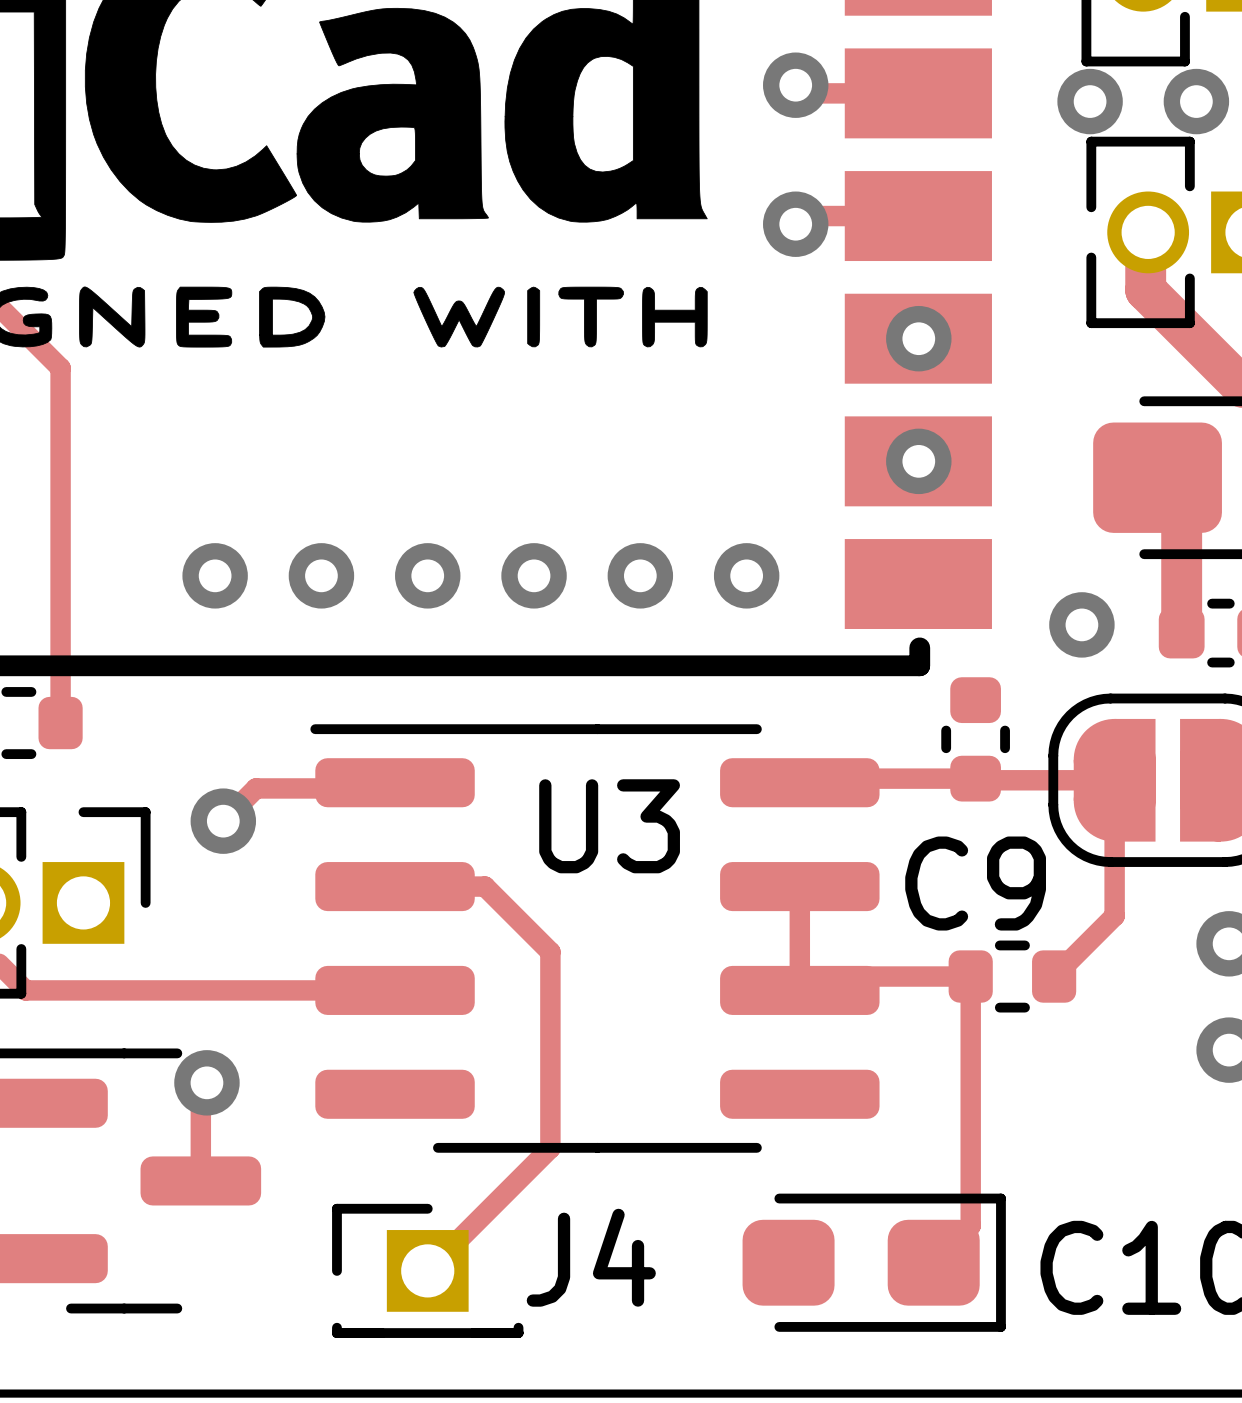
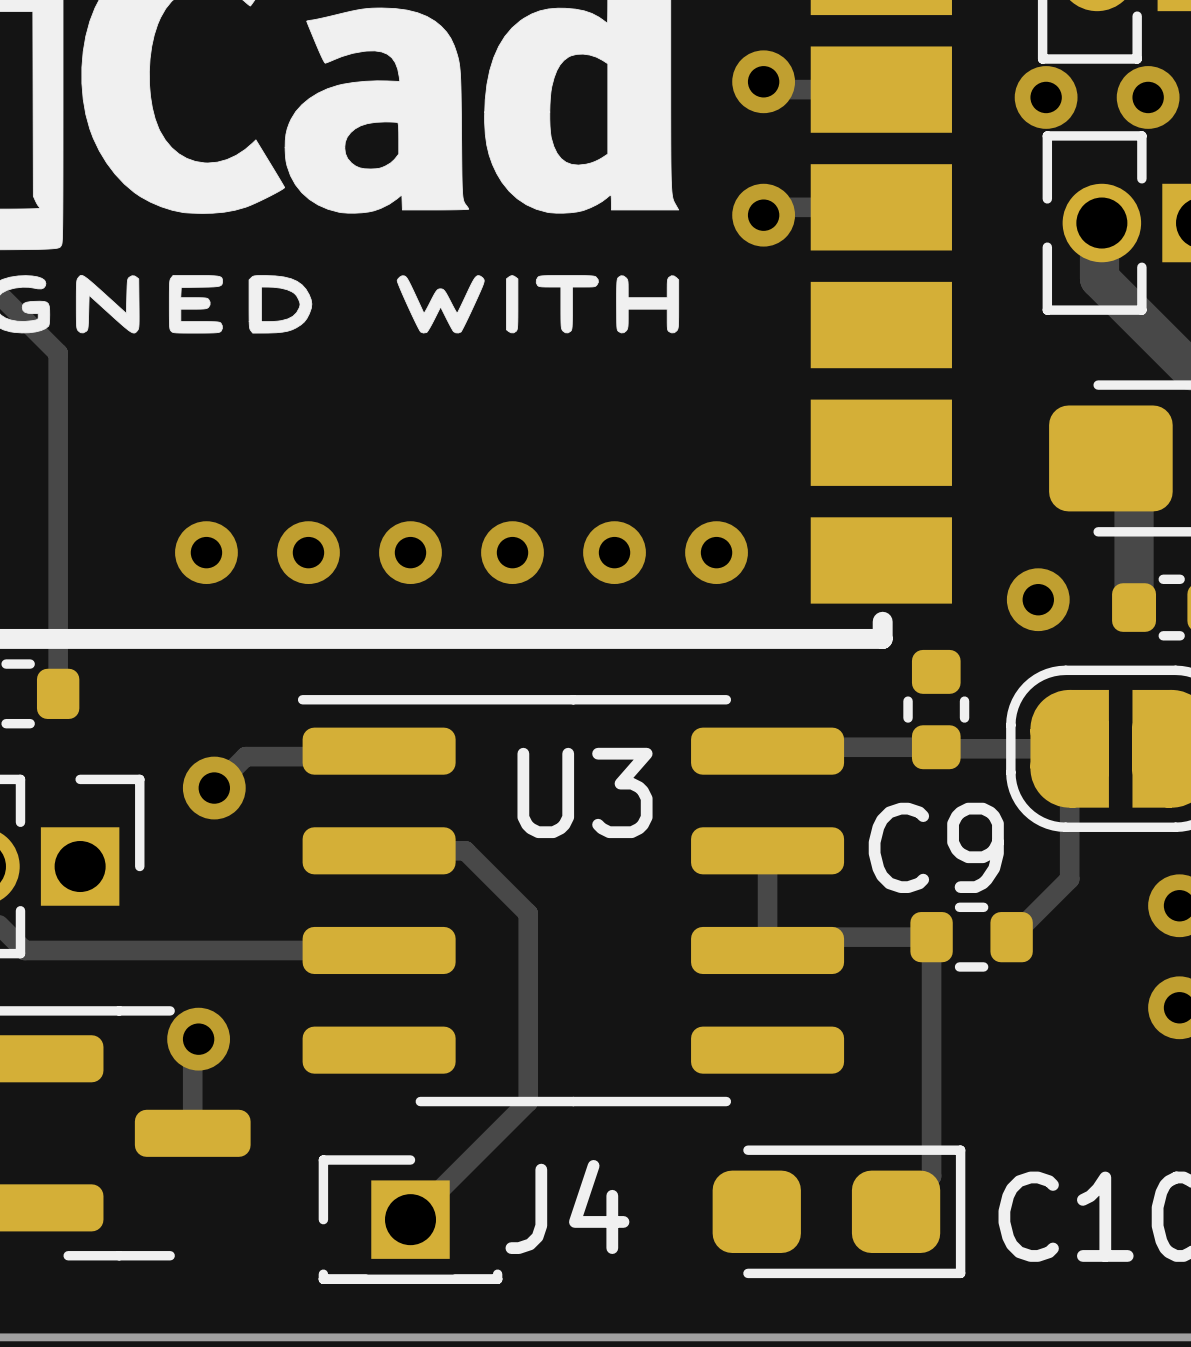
via: (918, 338) -> none
via: (918, 461) -> none

